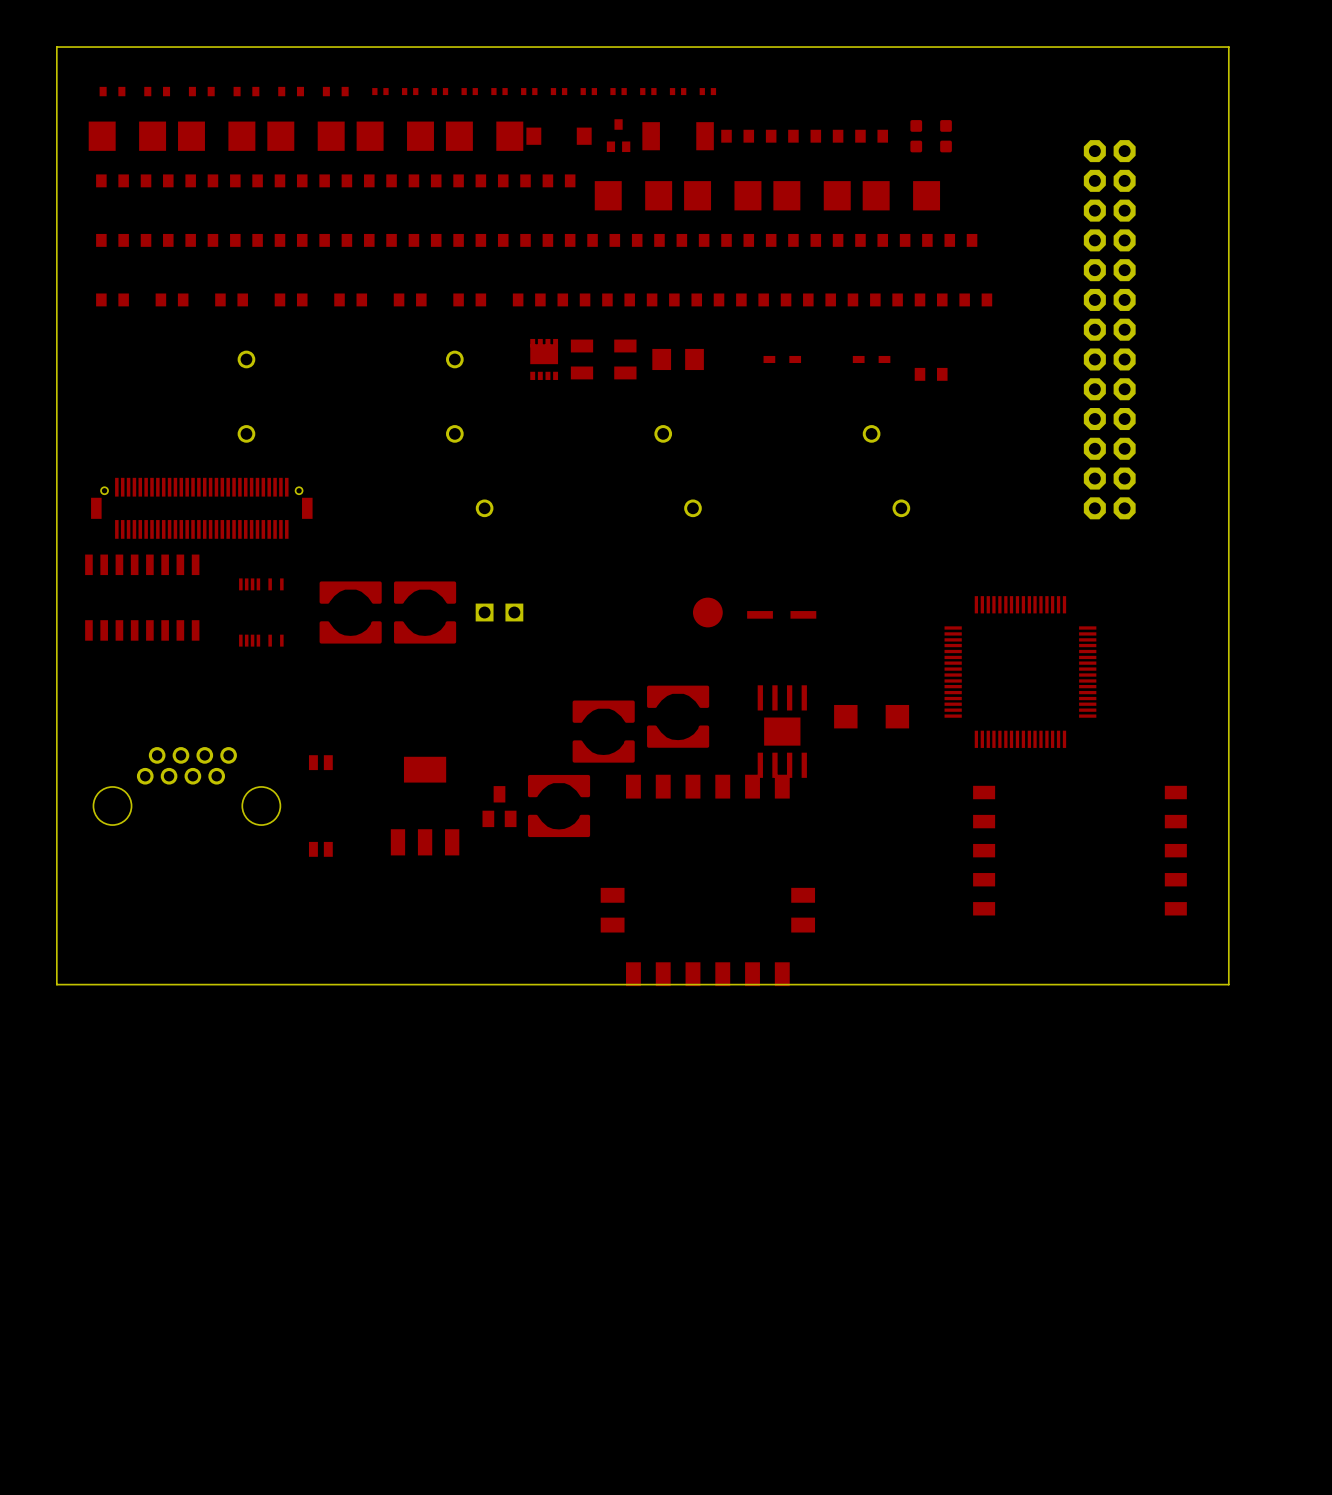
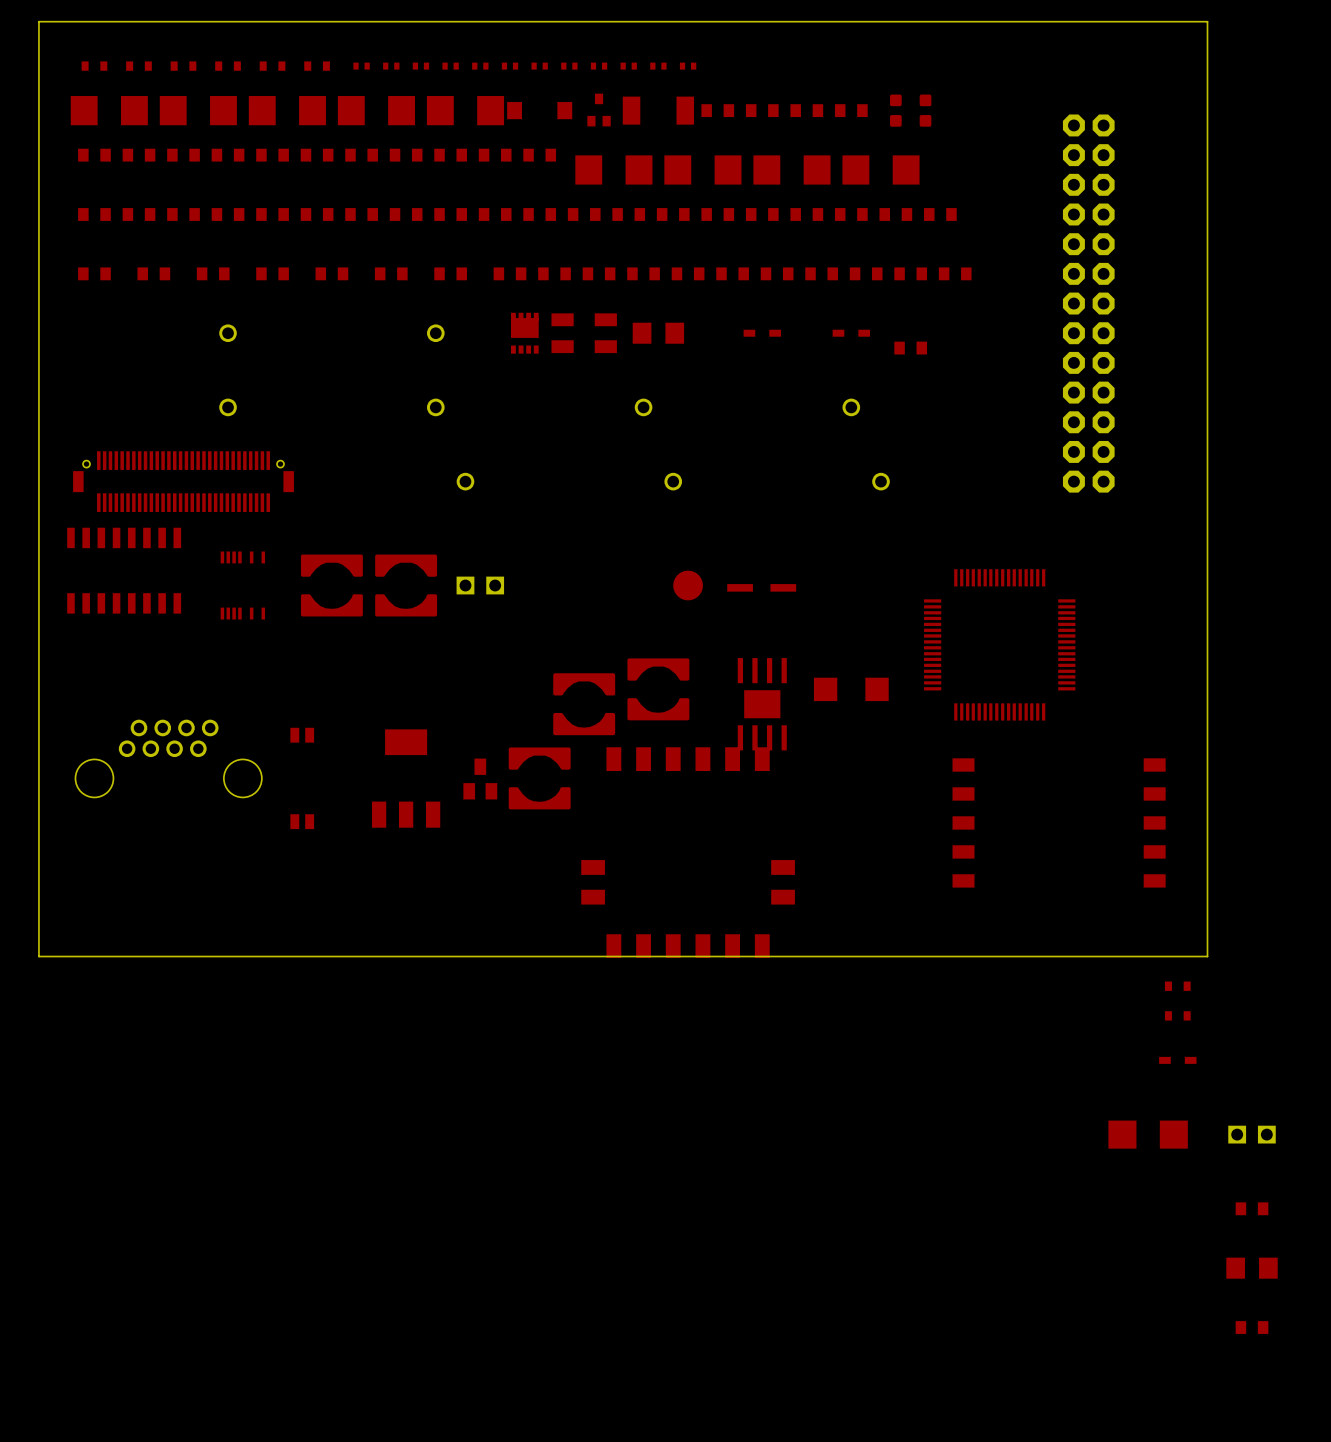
part: none -> (1177, 986)
part: none -> (1177, 1015)
part: none -> (1177, 1060)
part: none -> (1148, 1134)
part: none -> (1252, 1134)
part: none -> (1252, 1208)
part: none -> (1252, 1268)
part: none -> (1252, 1327)

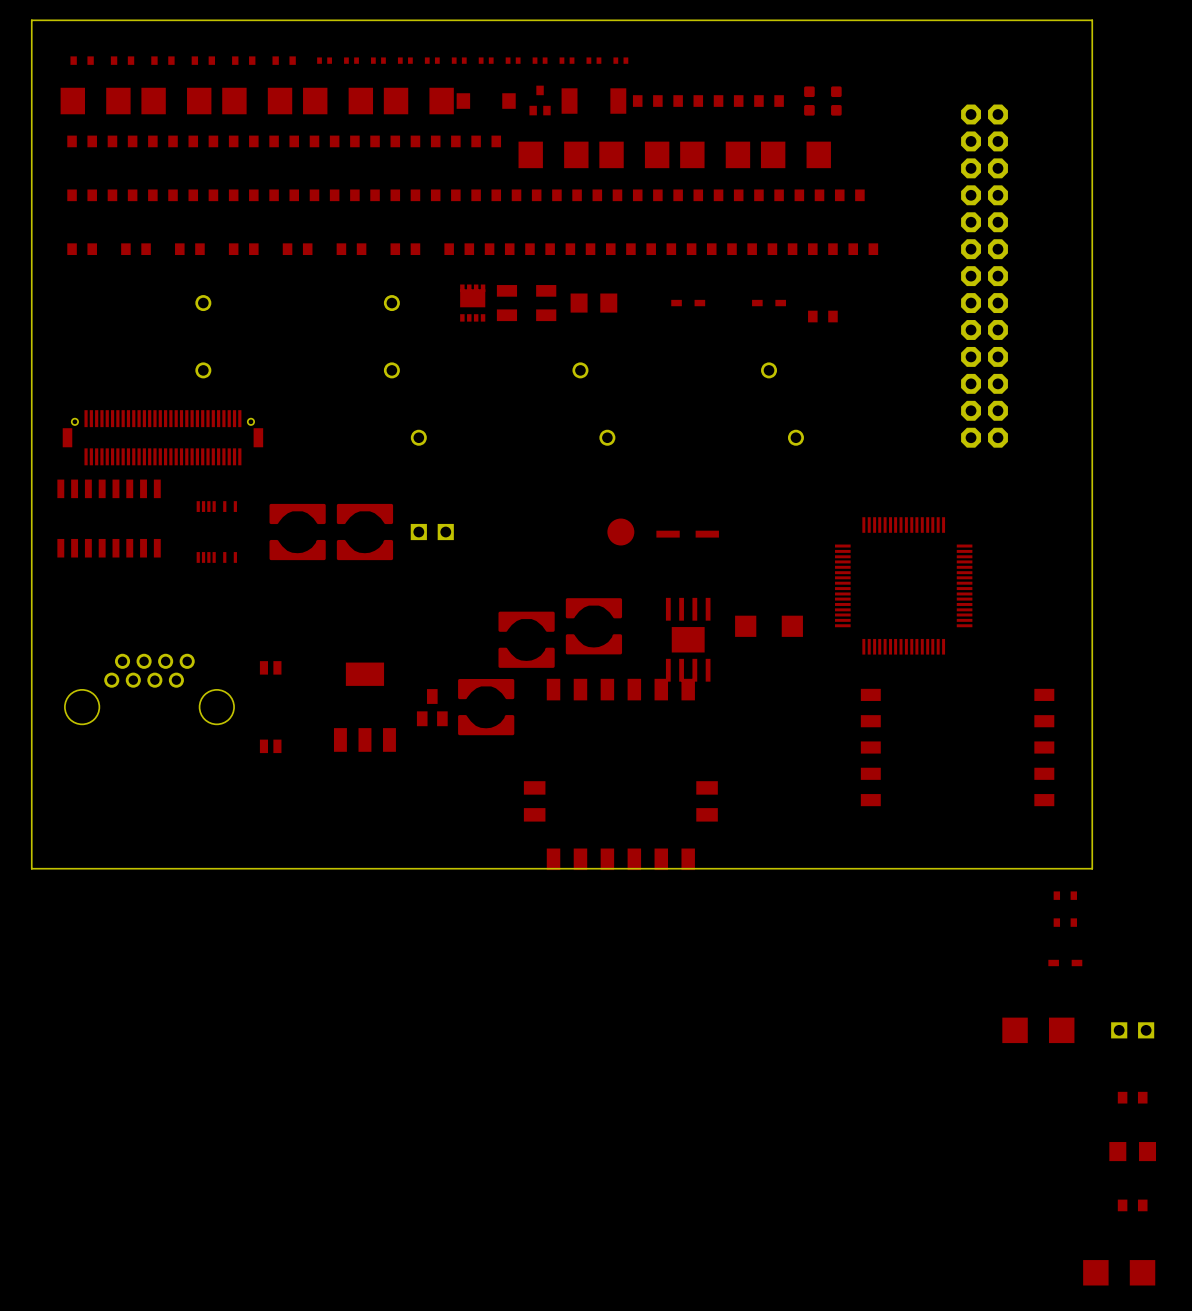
part: none -> (1119, 1272)

